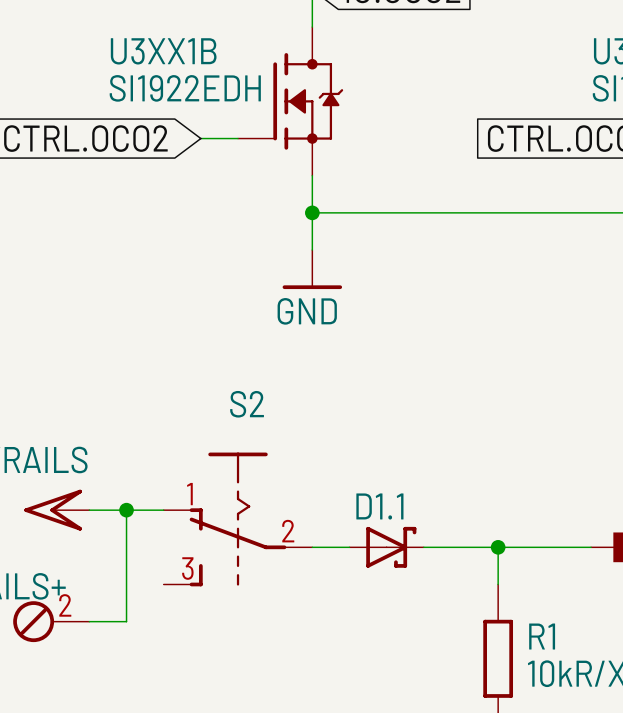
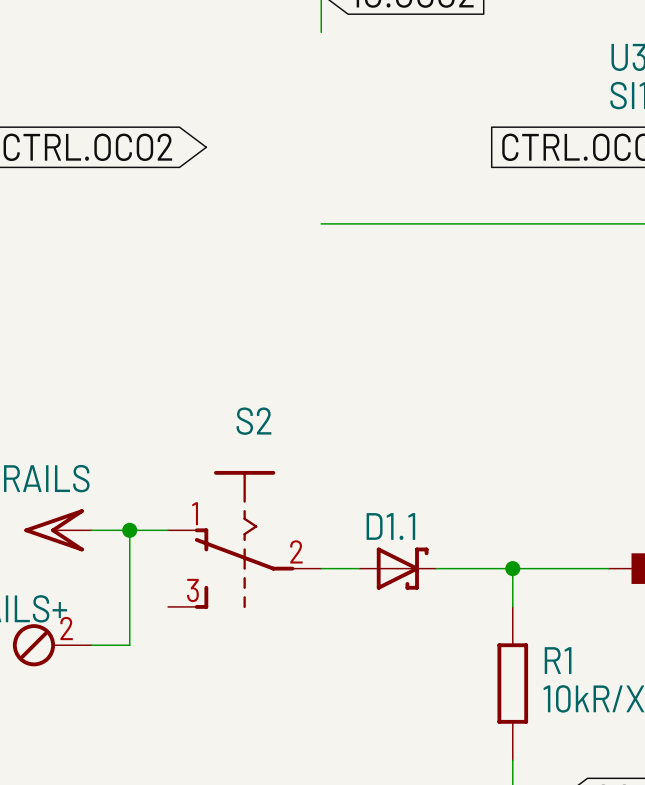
U3XX1B: SI1922EDH (290, 101) -> none
wire: (200, 138) (238, 138) -> none
wire: (312, 175) (312, 250) -> none
junction: (312, 212) -> none
power symbol: GND (312, 269) -> none

